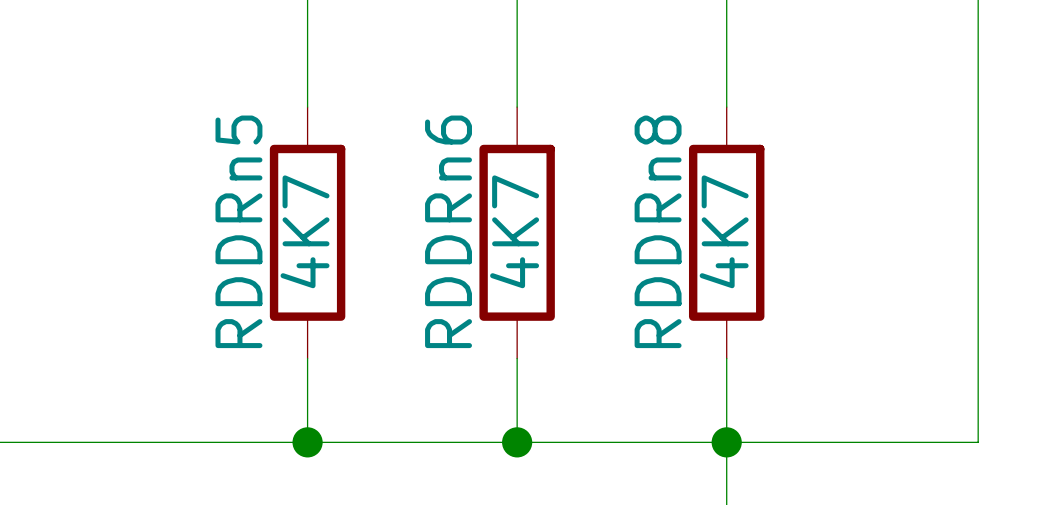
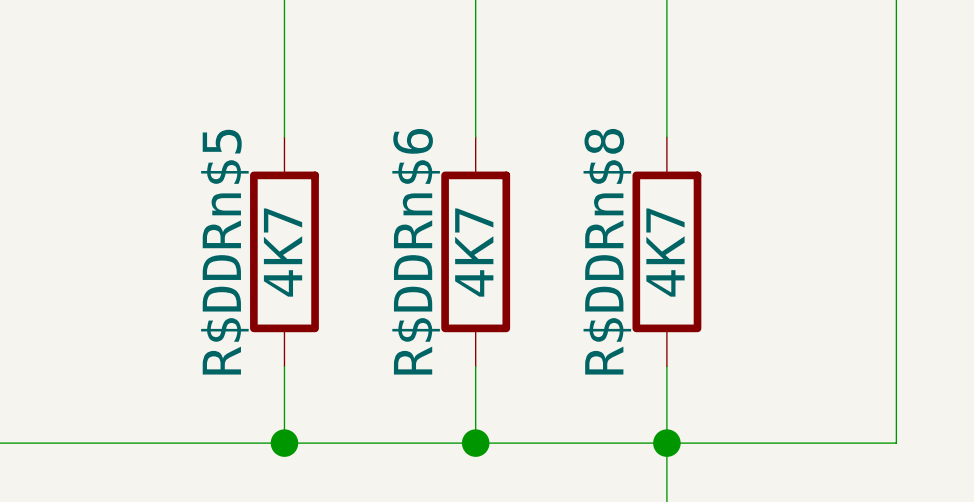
RDDRn5 name: RDDRn5 (238, 231) -> R$DDRn$5 (224, 252)
RDDRn6 name: RDDRn6 (448, 231) -> R$DDRn$6 (416, 251)
RDDRn8 name: RDDRn8 (658, 231) -> R$DDRn$8 (607, 251)

